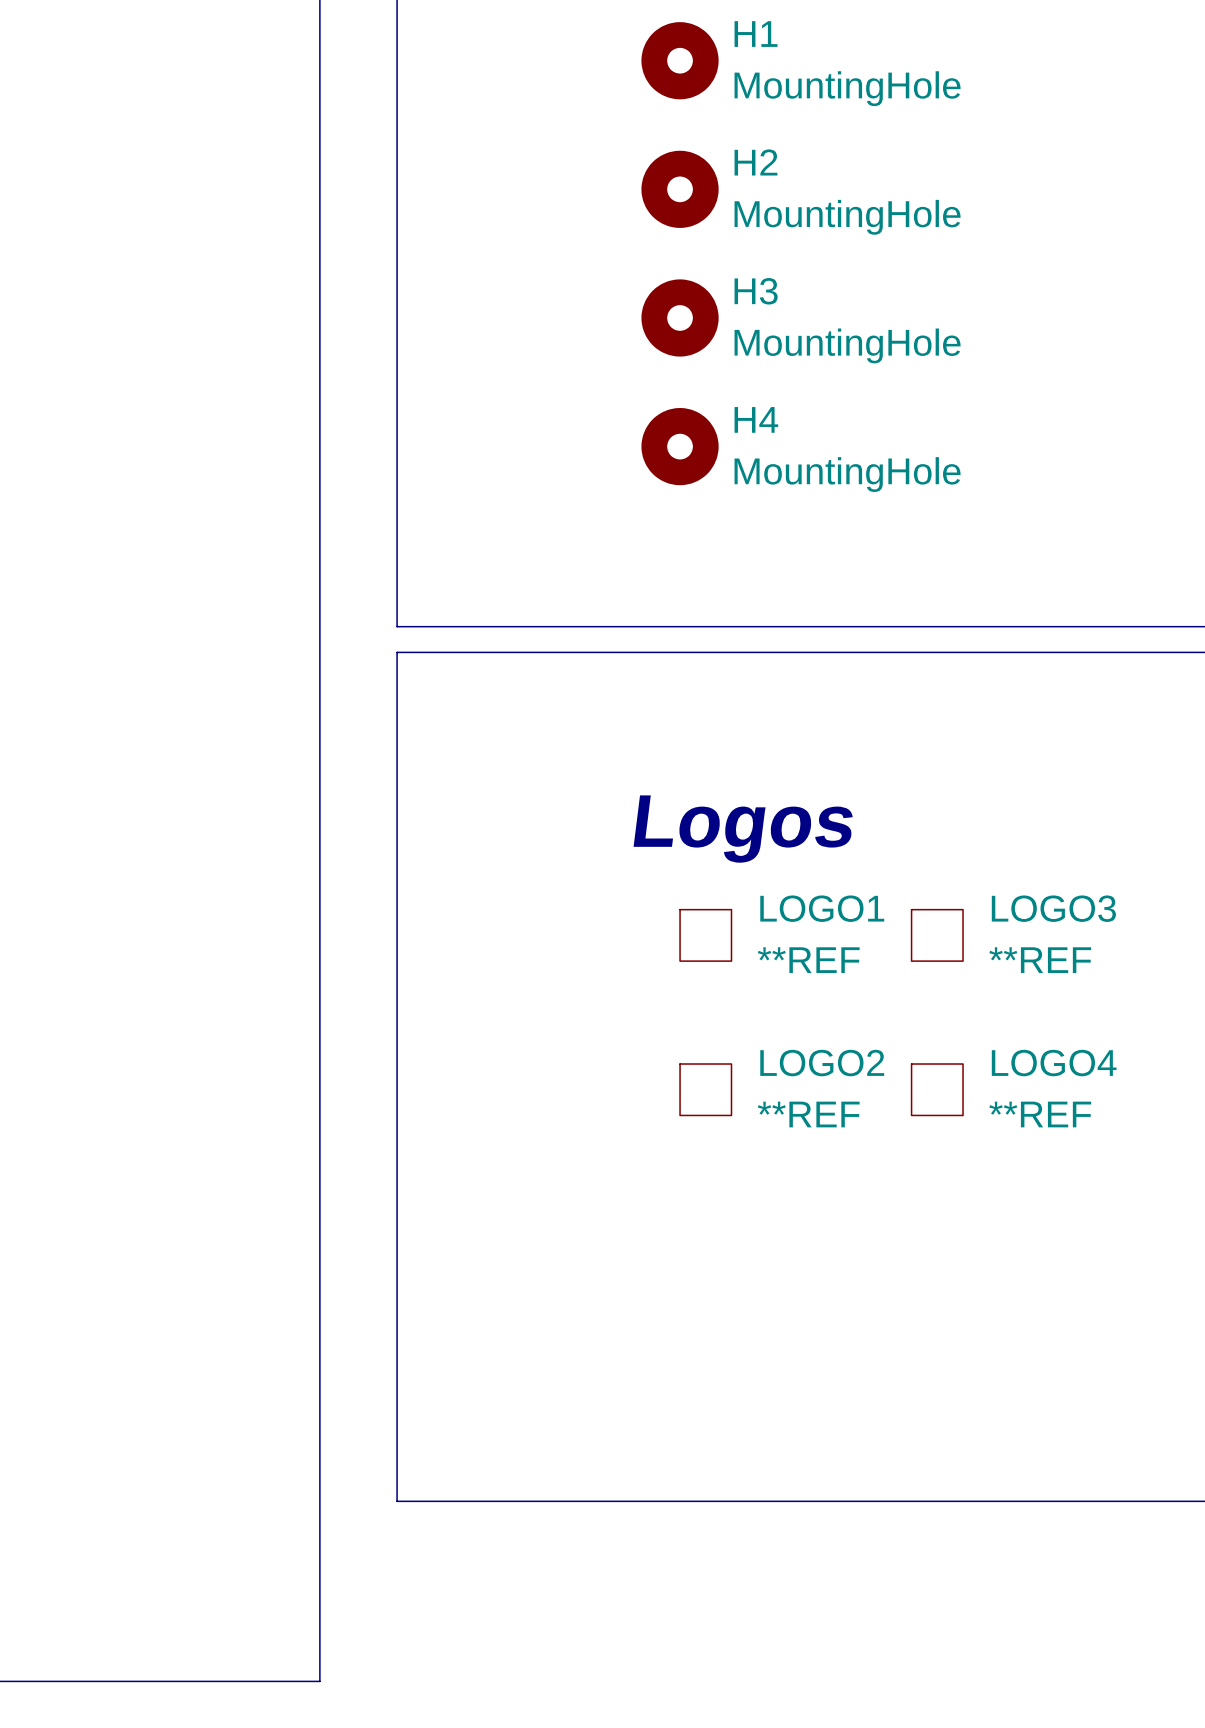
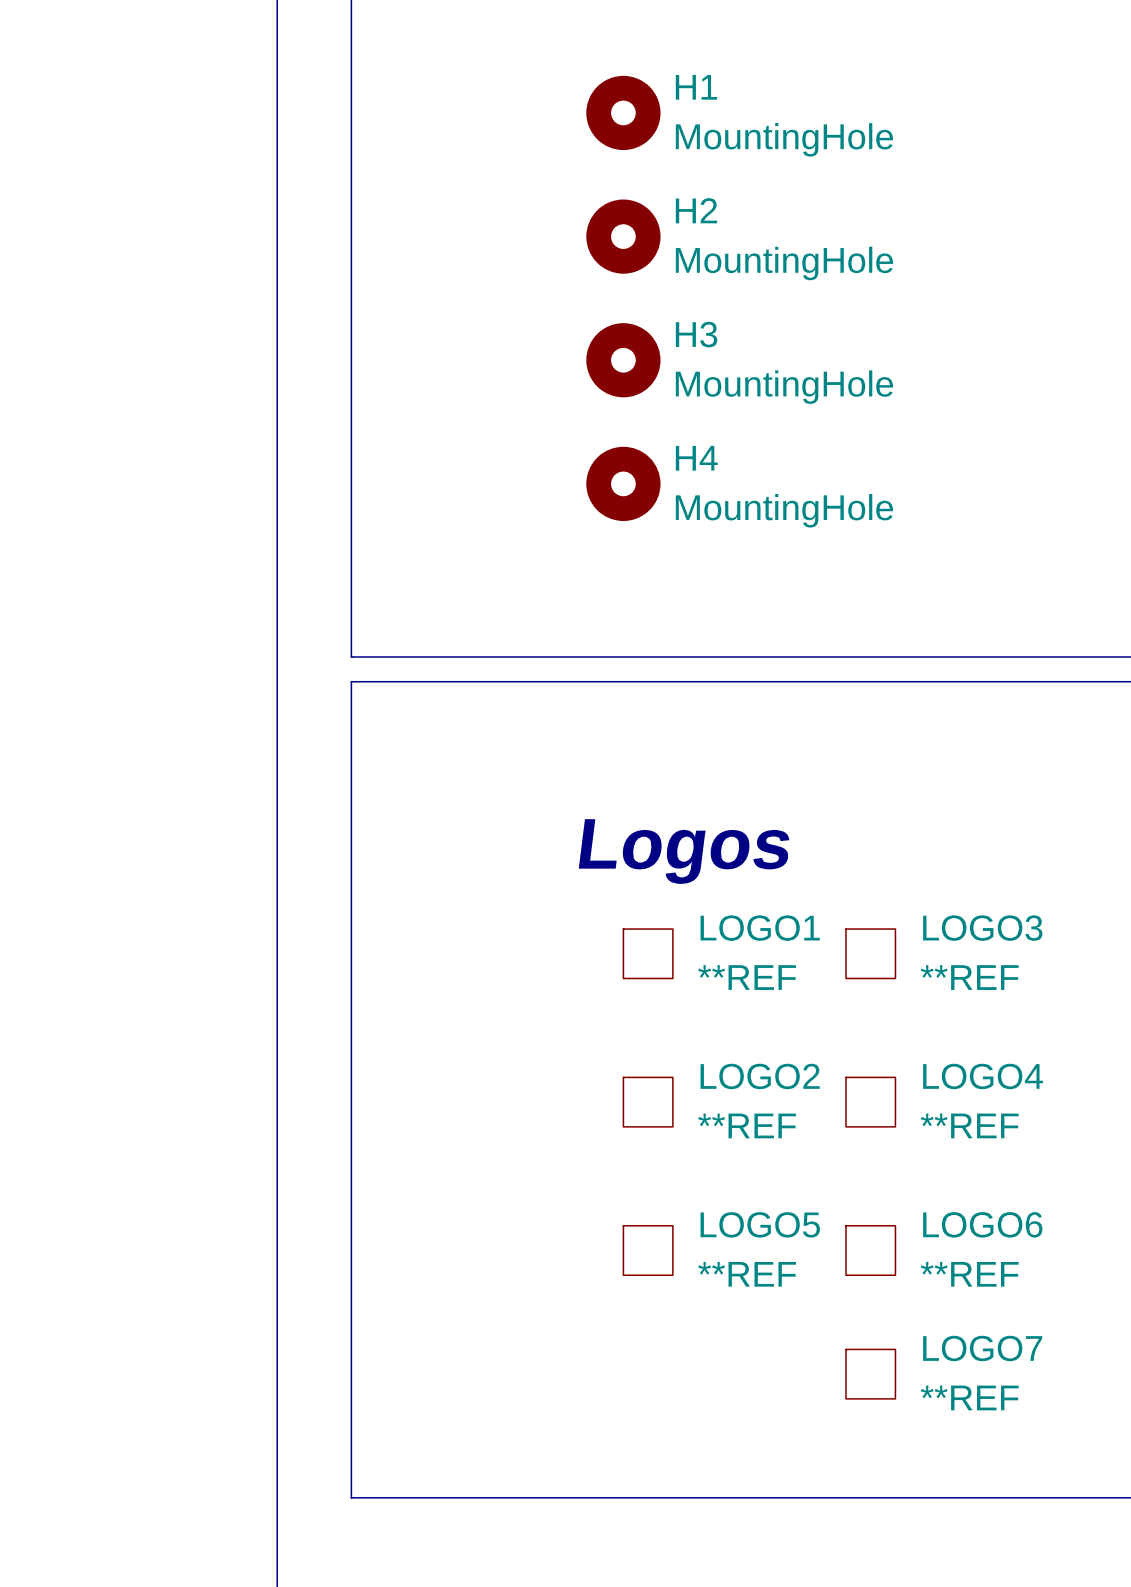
LOGO5: none -> **REF (648, 1250)
LOGO6: none -> **REF (870, 1250)
LOGO7: none -> **REF (870, 1374)

